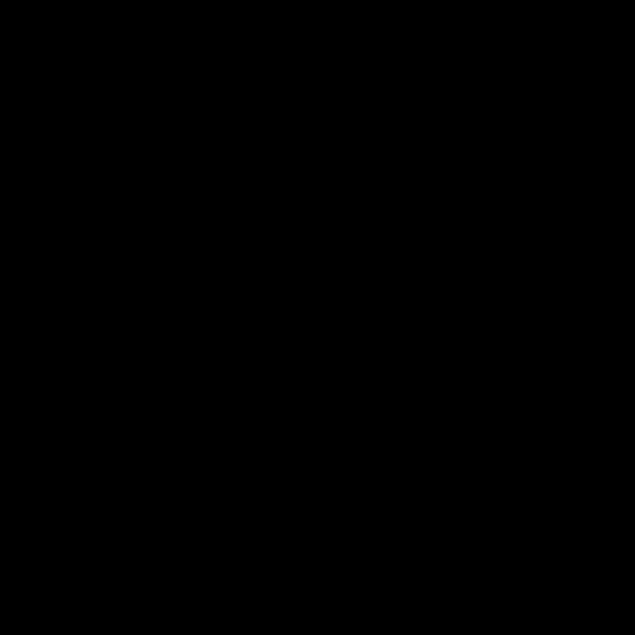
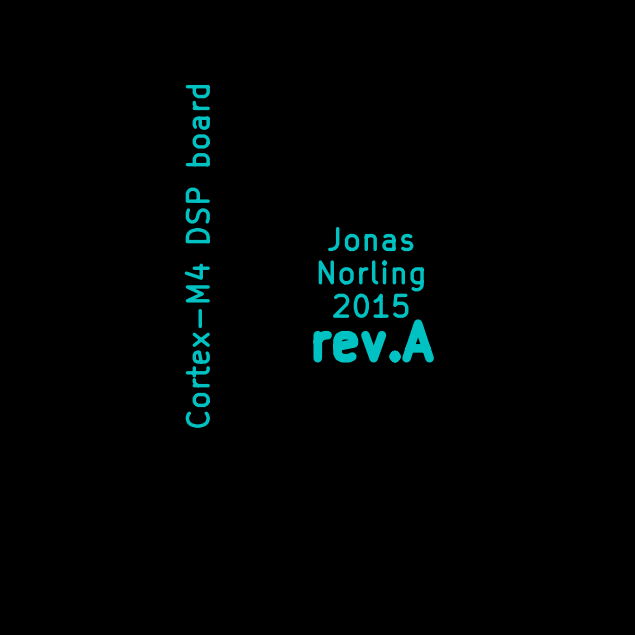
text: none -> Jonas (370, 239)
text: none -> Cortex-M4 DSP board (197, 256)
text: none -> Norling (371, 275)
text: none -> 2015 (370, 305)
text: none -> rev.A (373, 340)

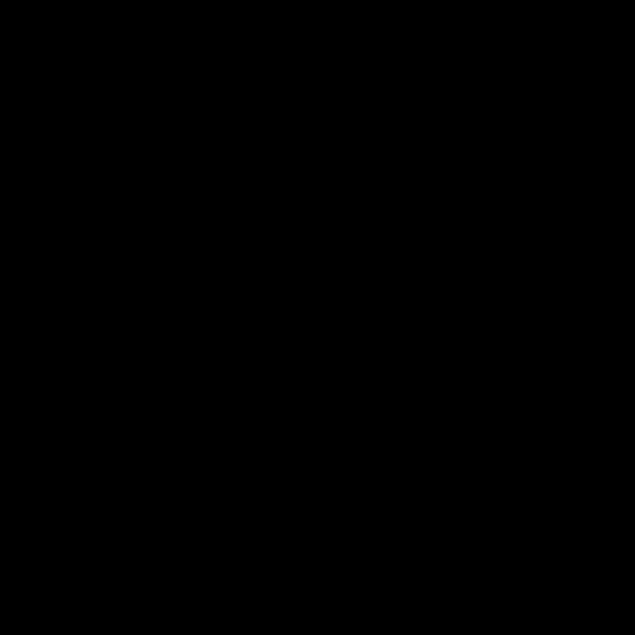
text: Jonas (370, 239) -> none
text: Cortex-M4 DSP board (197, 256) -> none
text: Norling (371, 275) -> none
text: 2015 (370, 305) -> none
text: rev.A (373, 340) -> none

